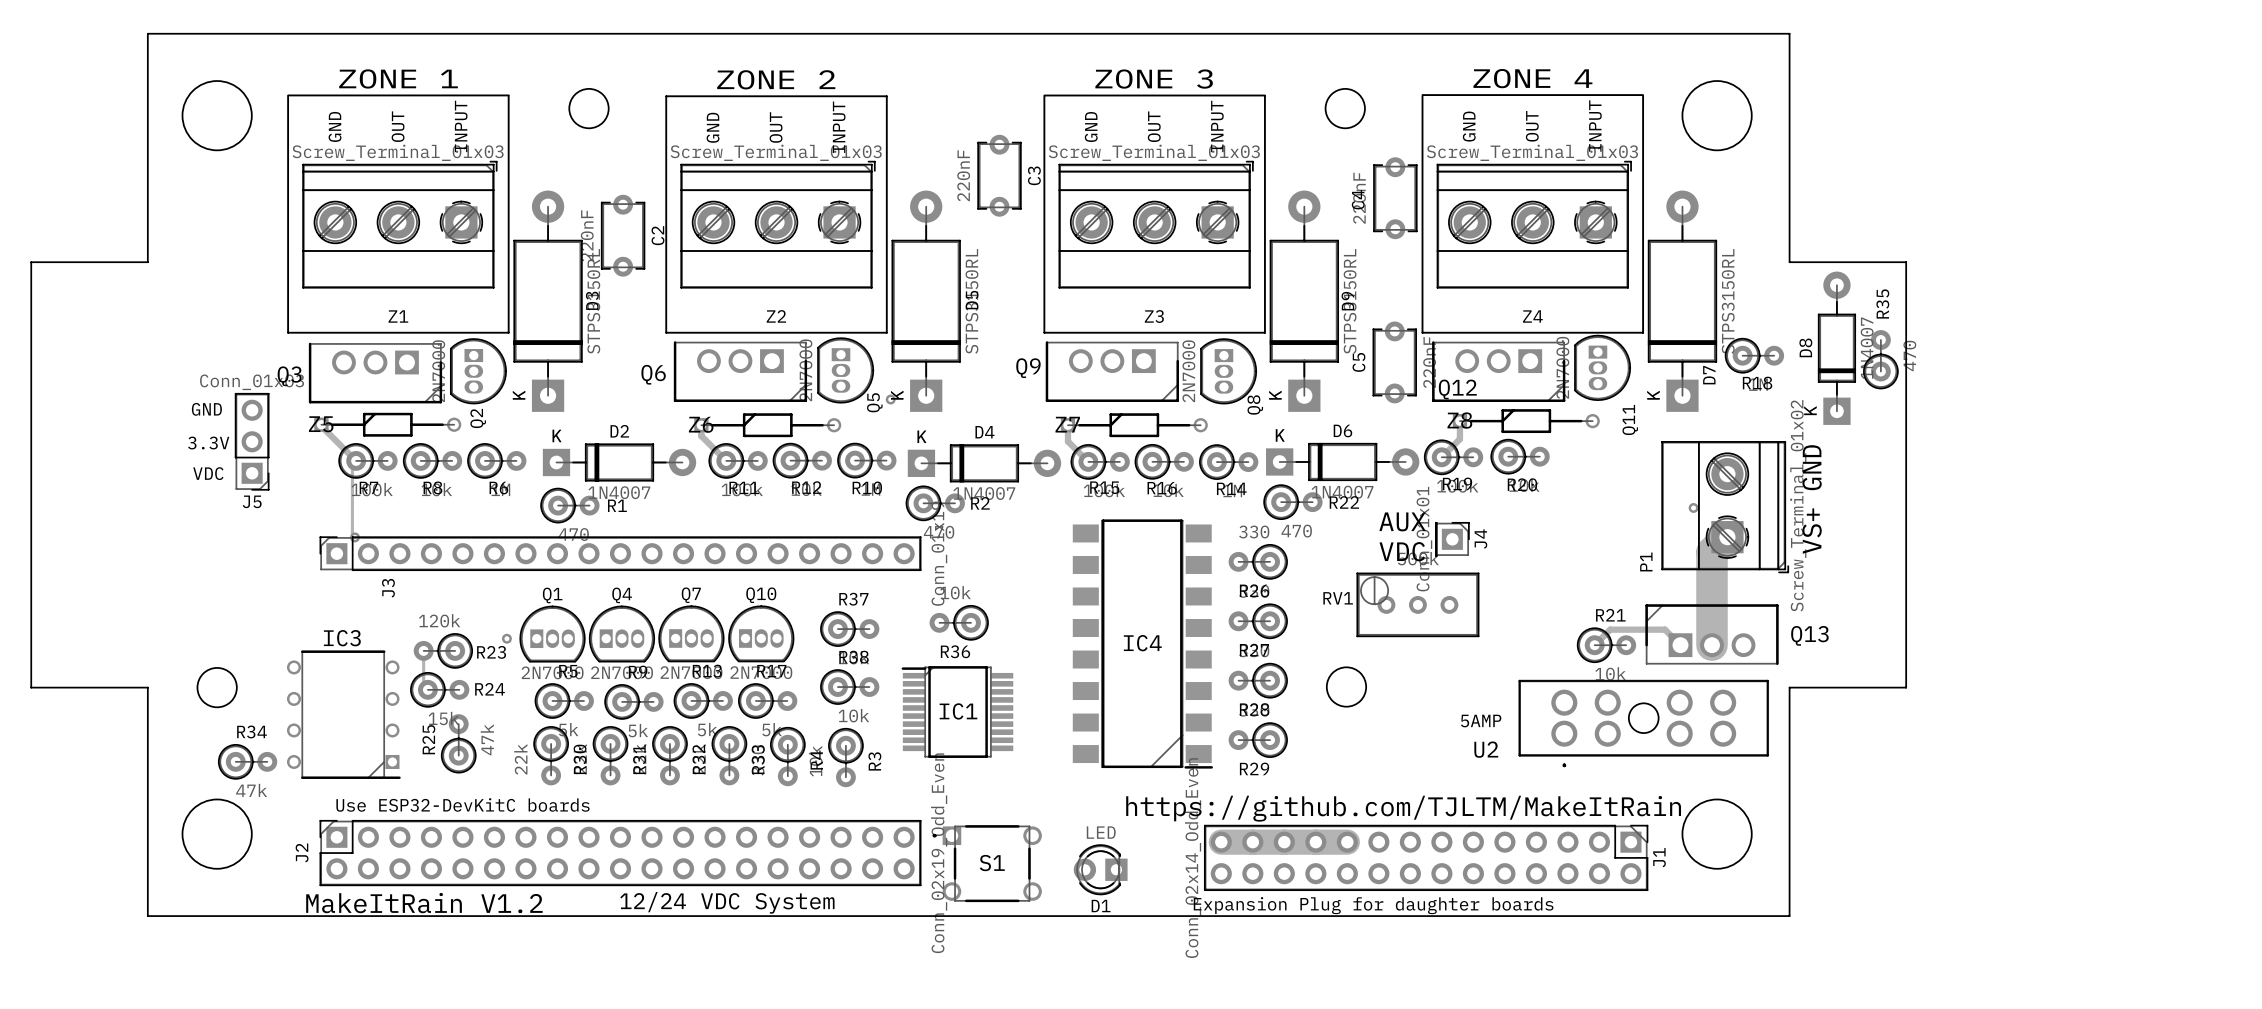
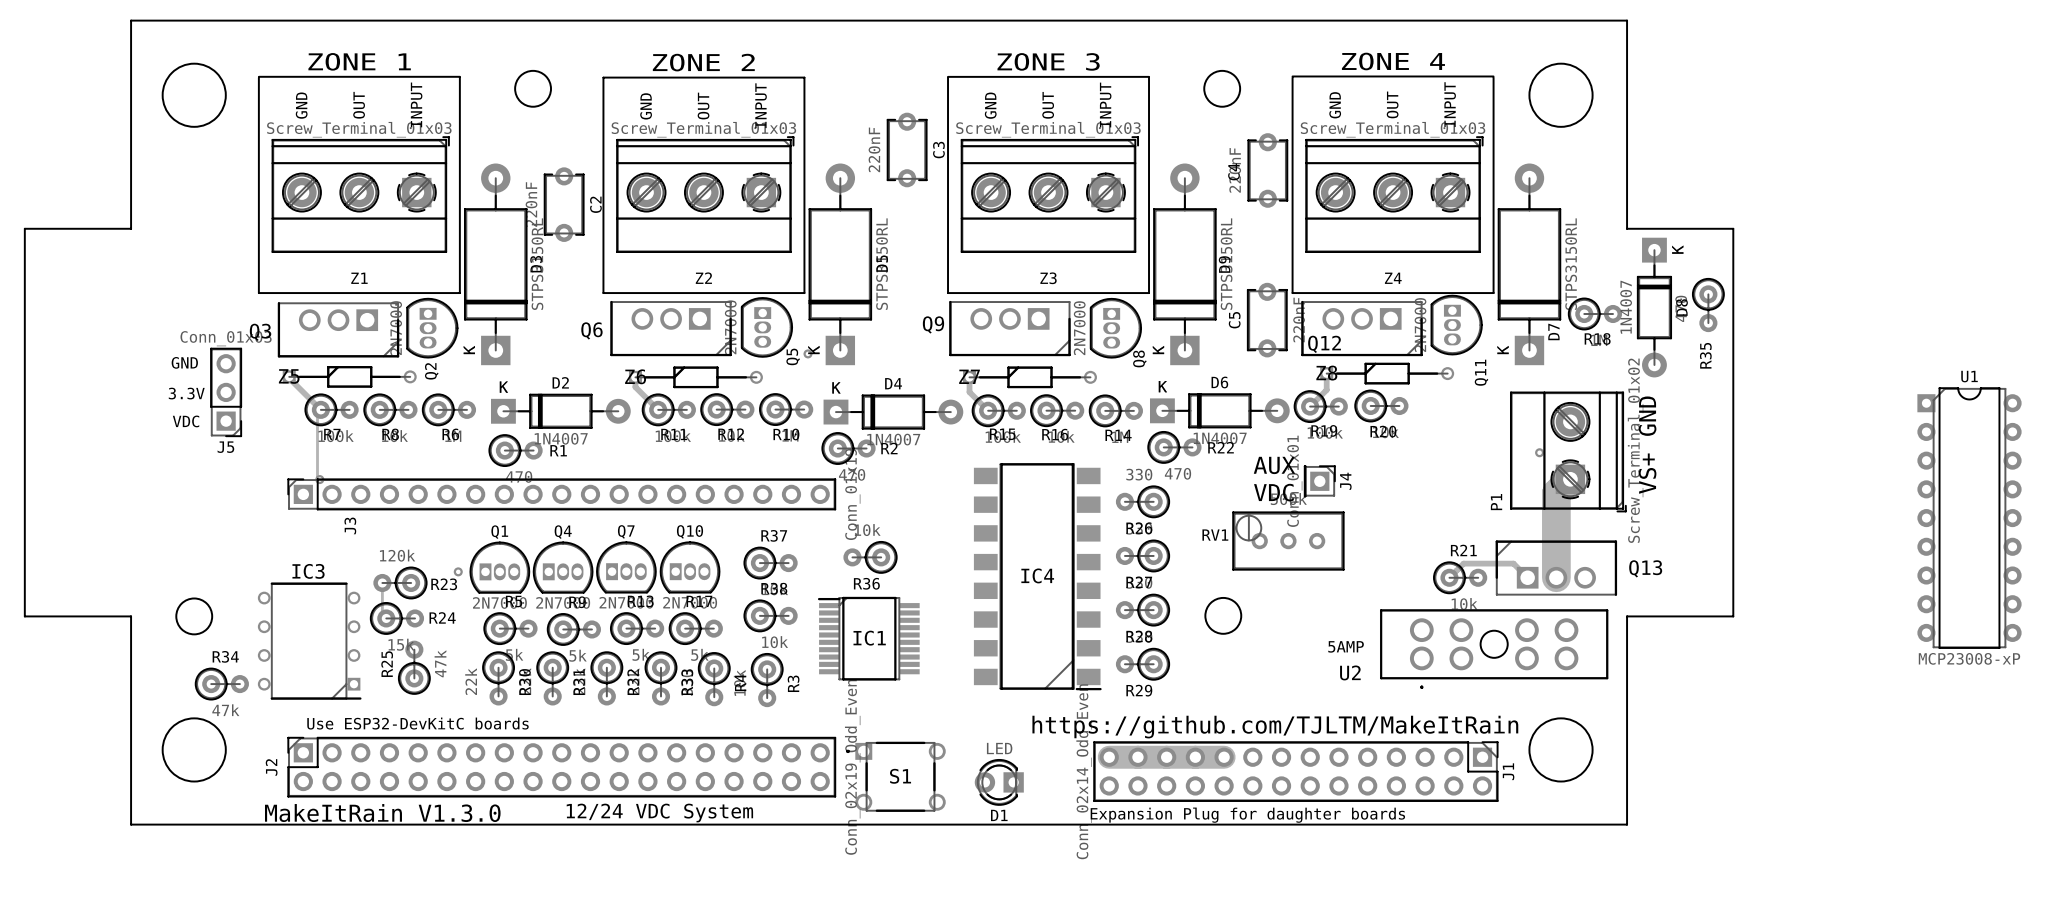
D8 rotation: 0° (1836, 348) -> 180° (1654, 307)
R35 rotation: 0° (1880, 359) -> 180° (1708, 305)
U1: none -> MCP23008-xP (1969, 518)
text: MakeItRain V1.2 (424, 903) -> MakeItRain V1.3.0 (382, 813)

